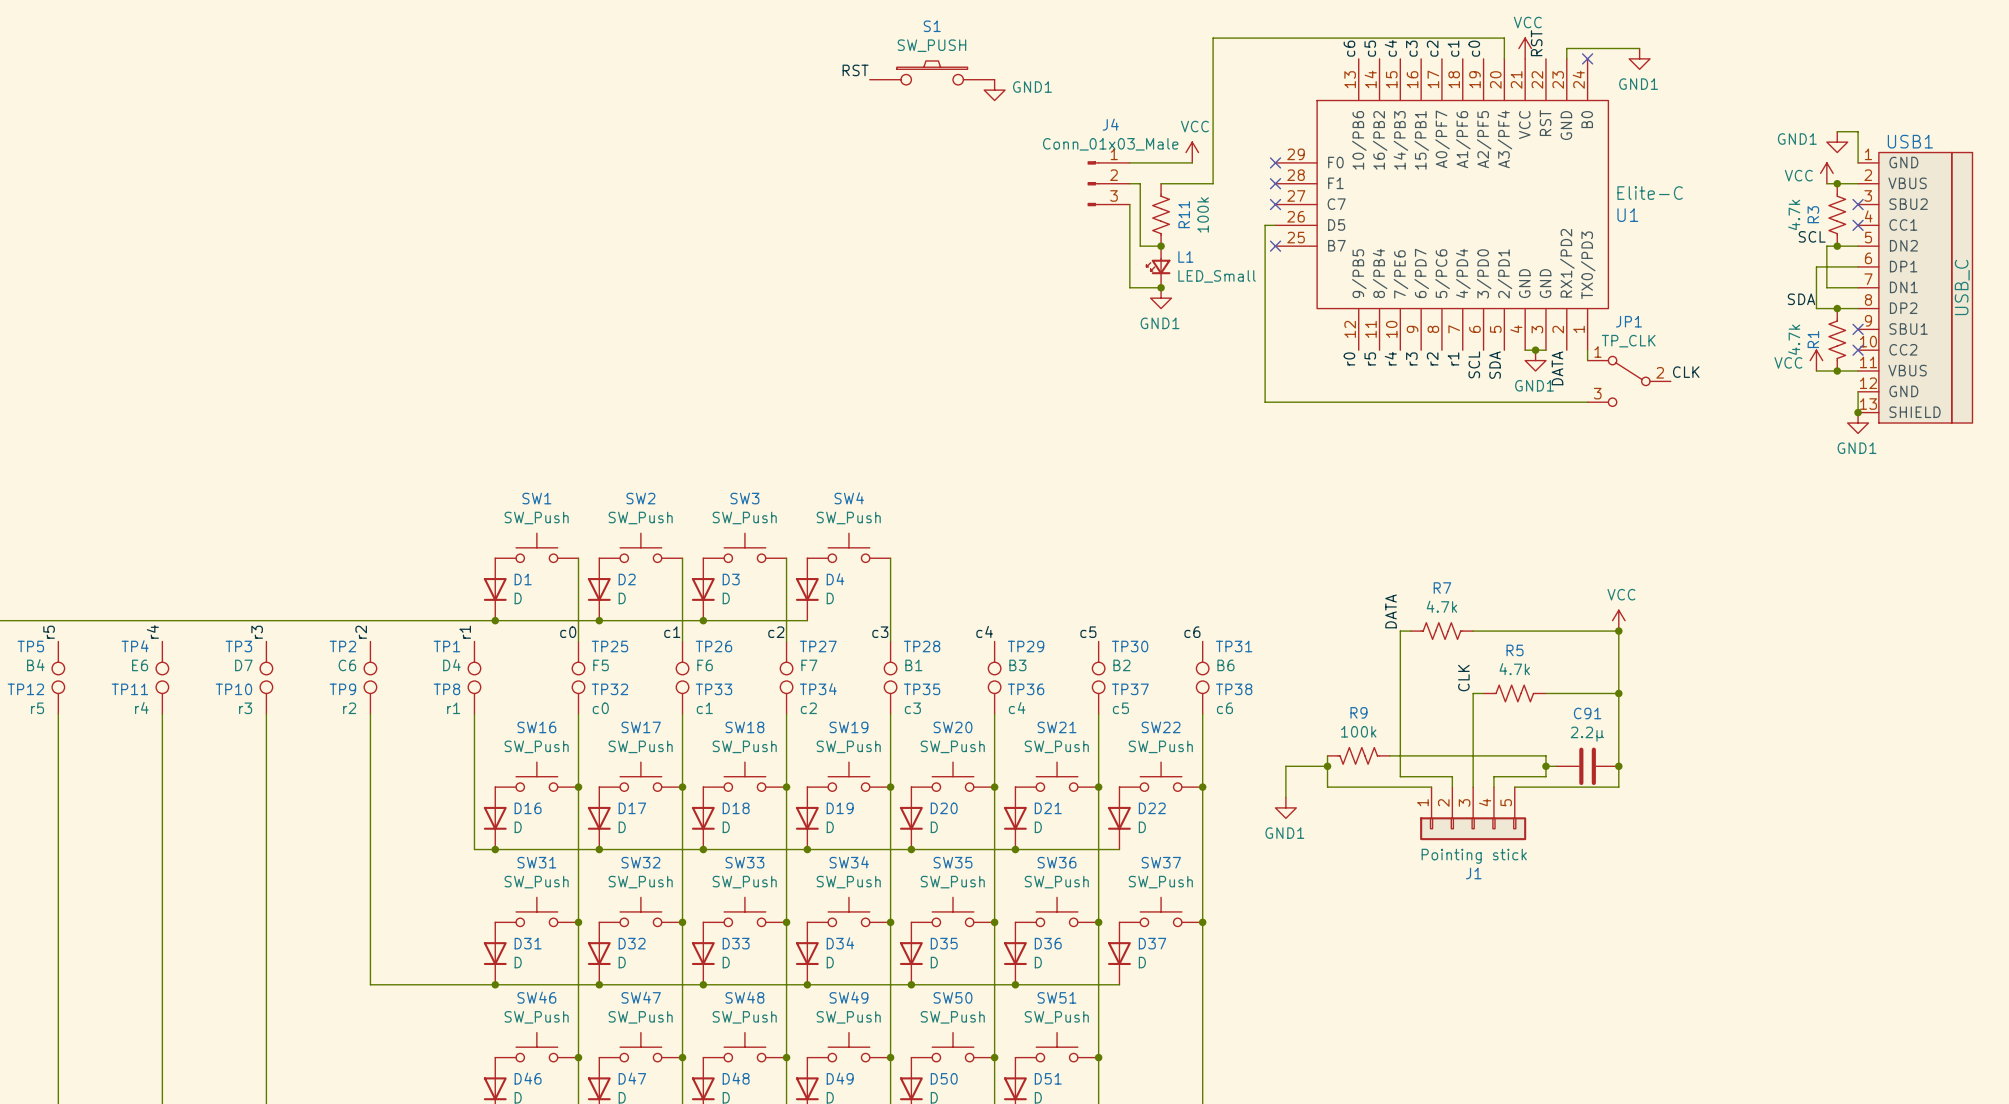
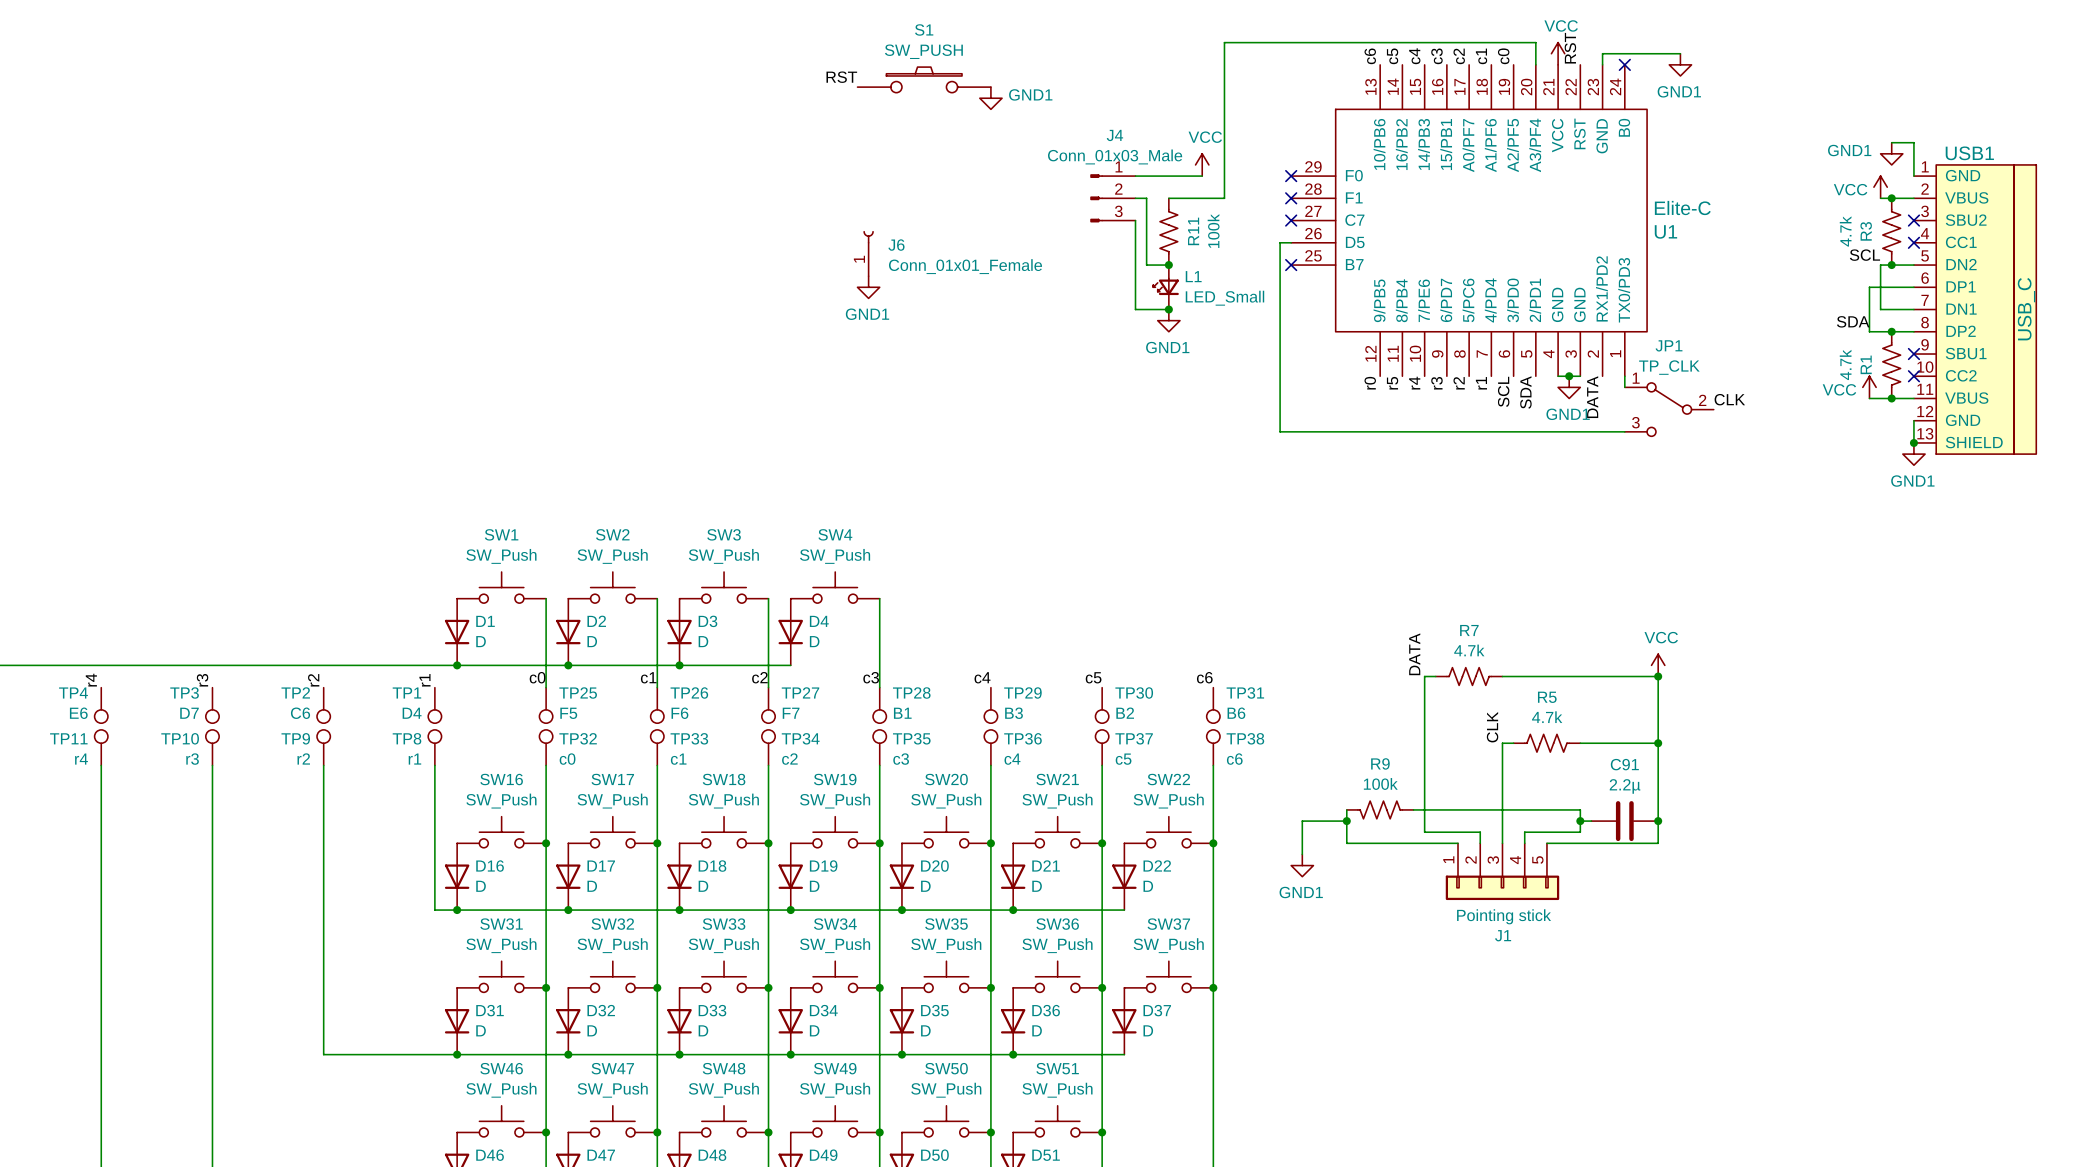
J6: none -> Conn_01x01_Female (868, 253)
power symbol: none -> GND1 (868, 287)

